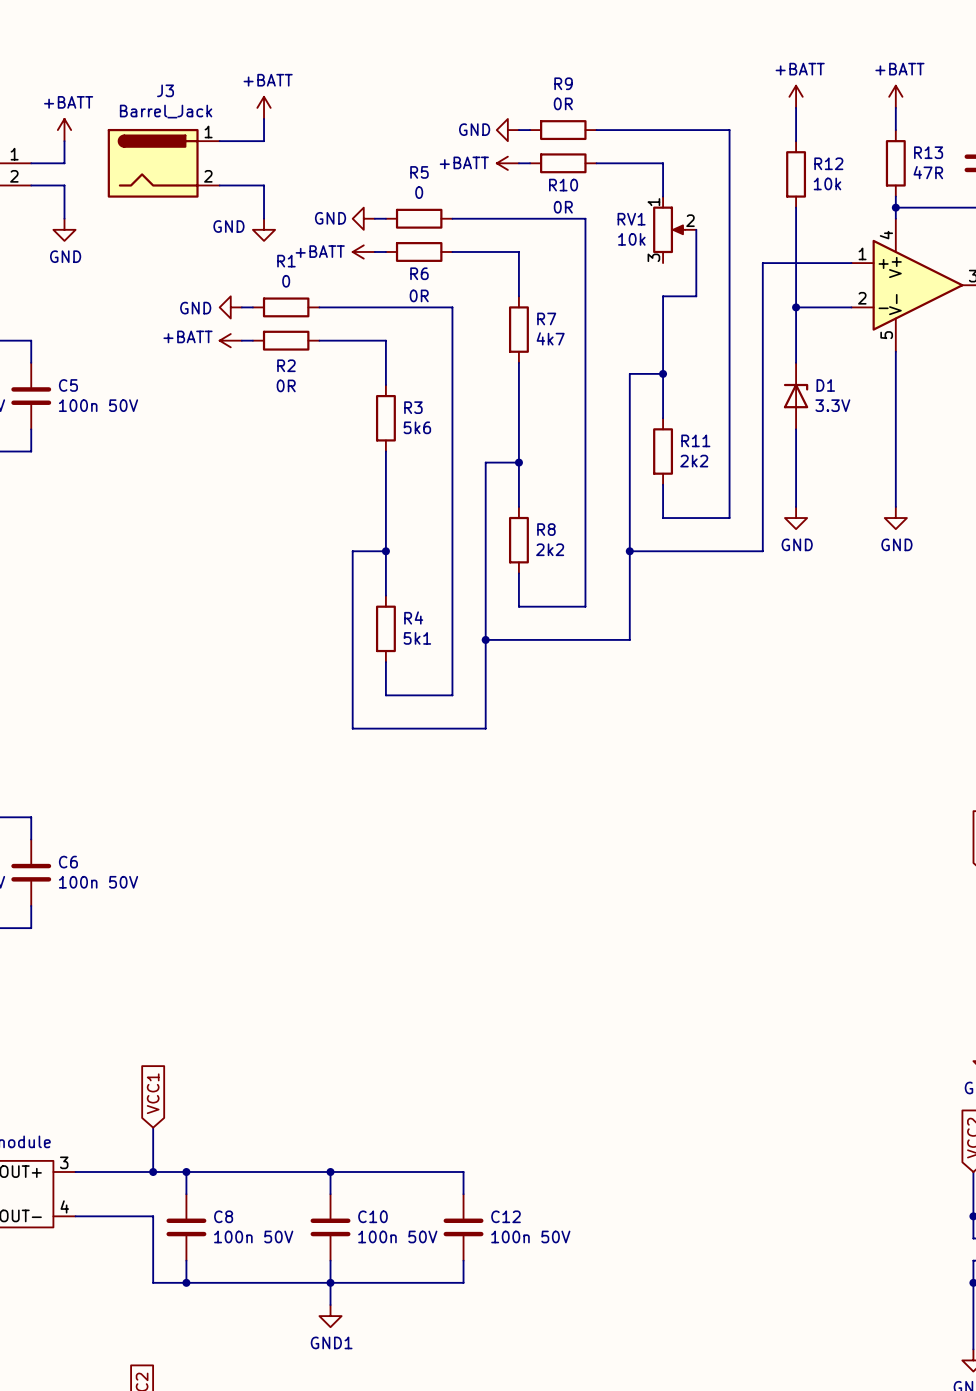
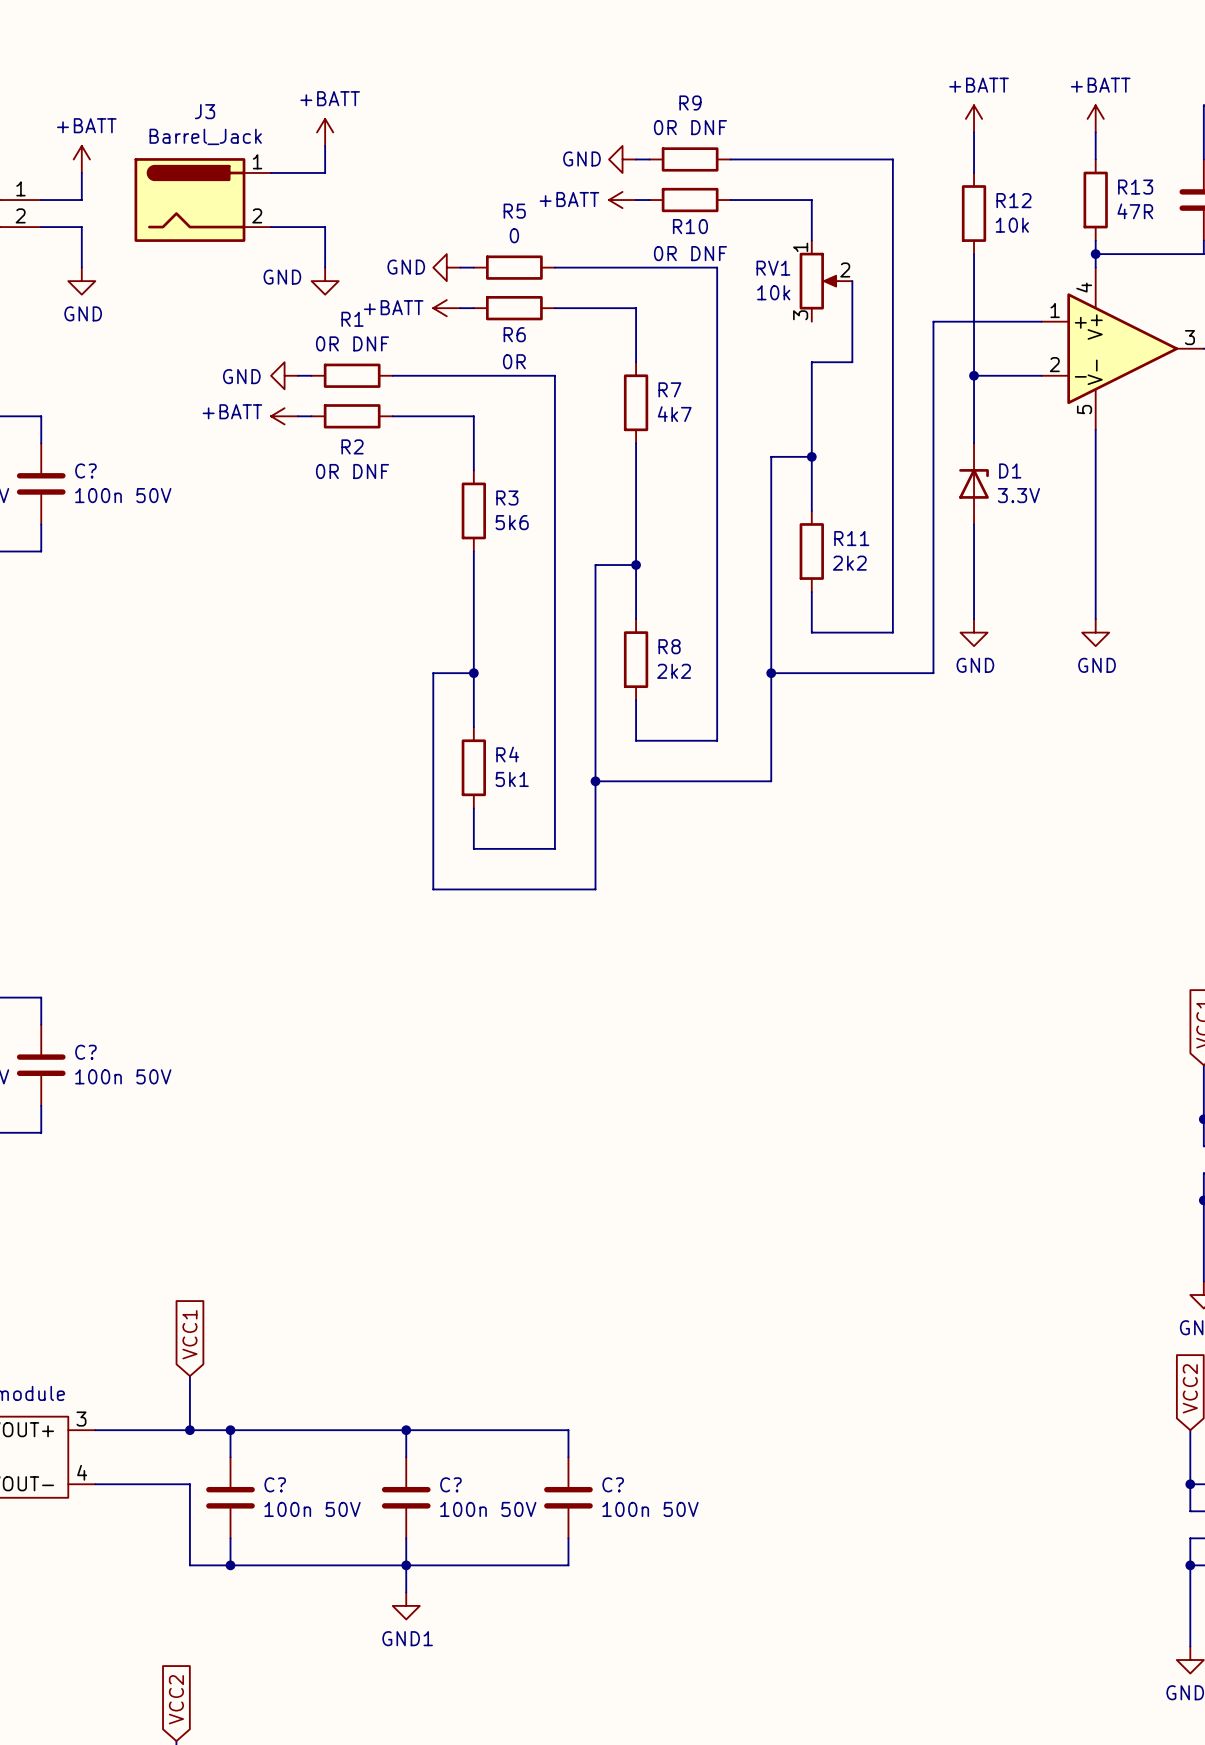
R9 value: 0R (563, 103) -> 0R DNF (690, 127)
R10 value: 0R (563, 207) -> 0R DNF (690, 253)
R1 value: 0 (286, 281) -> 0R DNF (352, 343)
C5 name: C5 (68, 385) -> C? (85, 470)
R2 value: 0R (286, 385) -> 0R DNF (352, 471)
C6 name: C6 (68, 862) -> C? (85, 1052)
C8 name: C8 (223, 1216) -> C? (275, 1484)
C10 name: C10 (372, 1216) -> C? (450, 1484)
C12 name: C12 (506, 1216) -> C? (613, 1484)

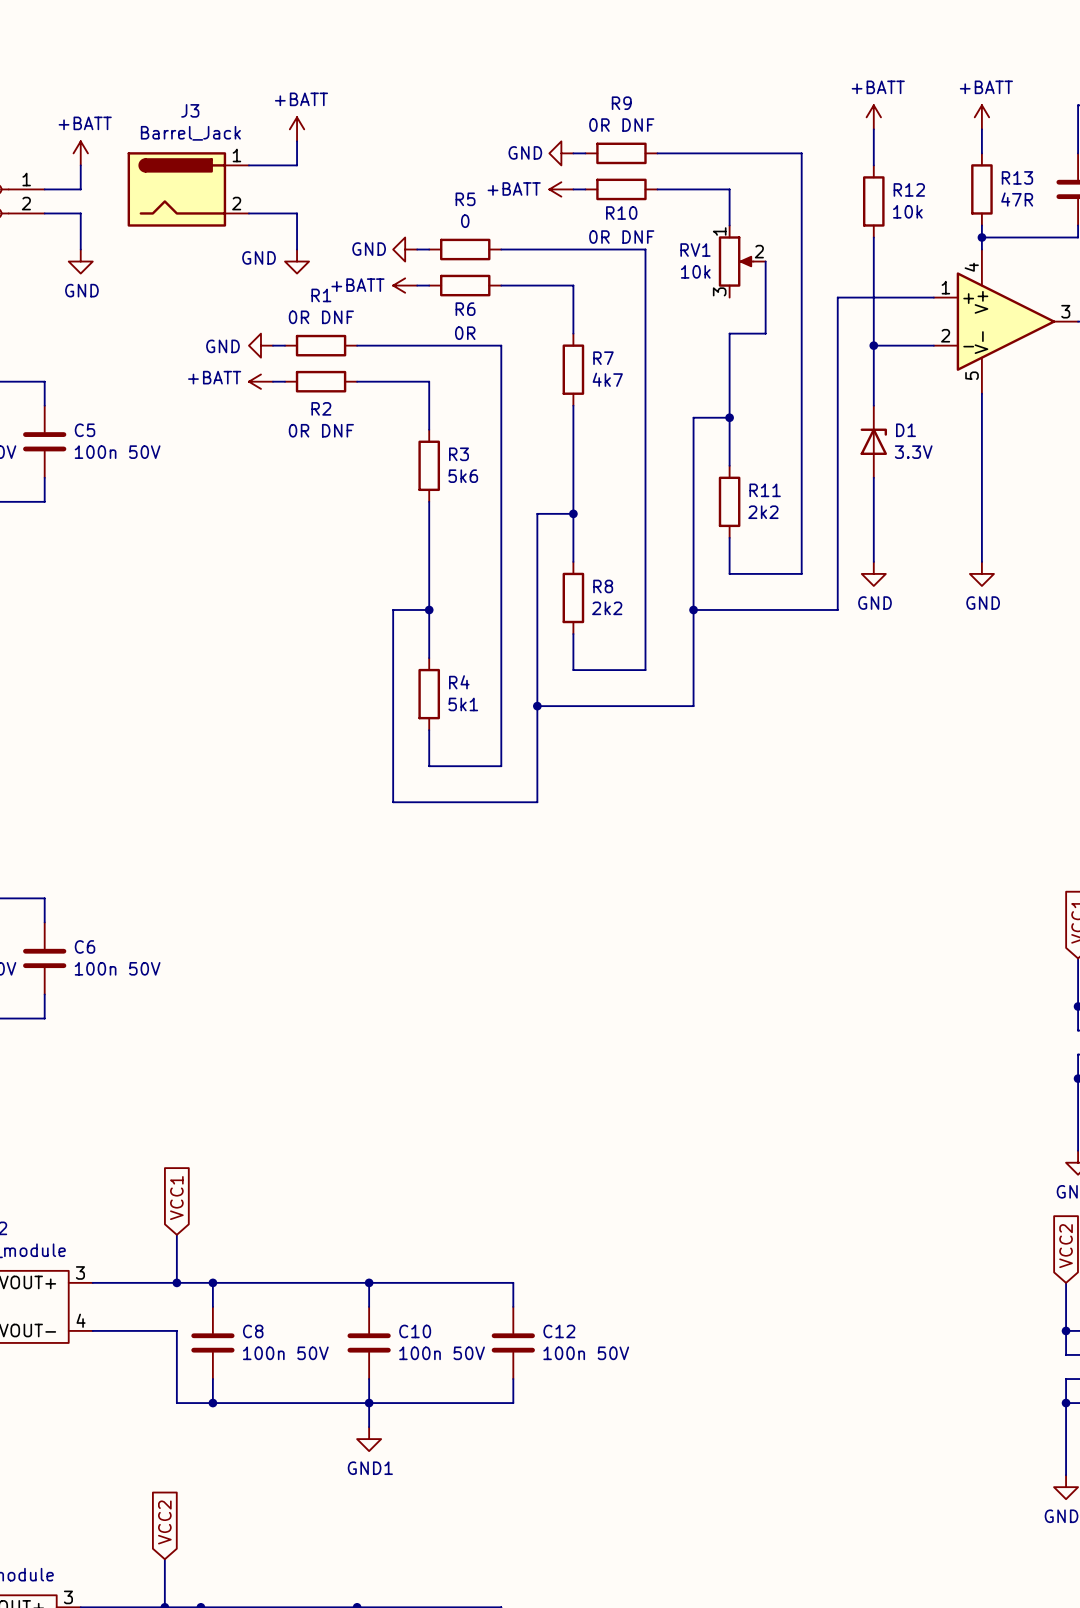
C? name: C? (85, 470) -> C5 (85, 430)
C? name: C? (85, 1052) -> C6 (85, 946)
C? name: C? (275, 1484) -> C8 (253, 1331)
C? name: C? (450, 1484) -> C10 (415, 1331)
C? name: C? (613, 1484) -> C12 (559, 1331)

